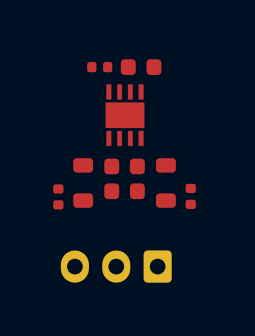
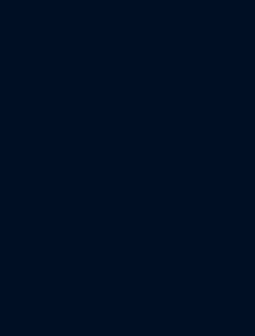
part: (99, 67) -> none
part: (141, 67) -> none
part: (124, 115) -> none
part: (124, 166) -> none
part: (83, 182) -> none
part: (165, 182) -> none
part: (124, 191) -> none
part: (58, 196) -> none
part: (190, 196) -> none
part: (116, 266) -> none

